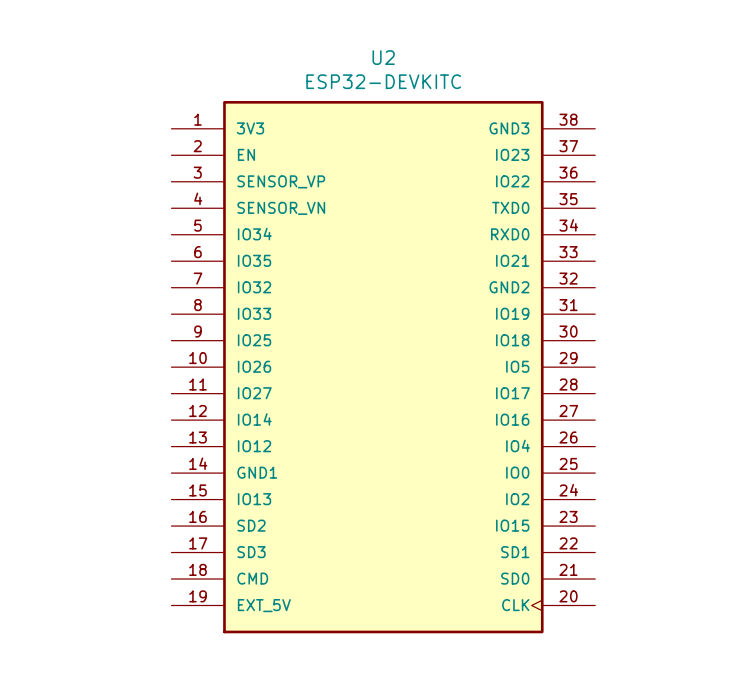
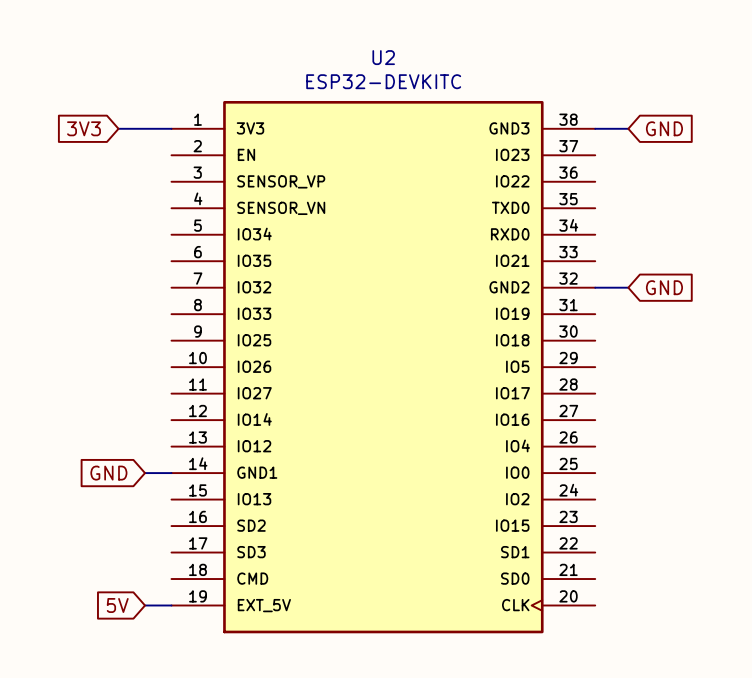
global label: none -> 3V3 (83, 128)
wire: none -> (118, 128) (171, 128)
wire: none -> (595, 128) (628, 128)
global label: none -> GND (664, 128)
wire: none -> (595, 287) (628, 287)
global label: none -> GND (664, 287)
global label: none -> GND (108, 473)
wire: none -> (145, 473) (171, 473)
global label: none -> 5V (117, 605)
wire: none -> (145, 605) (171, 605)

